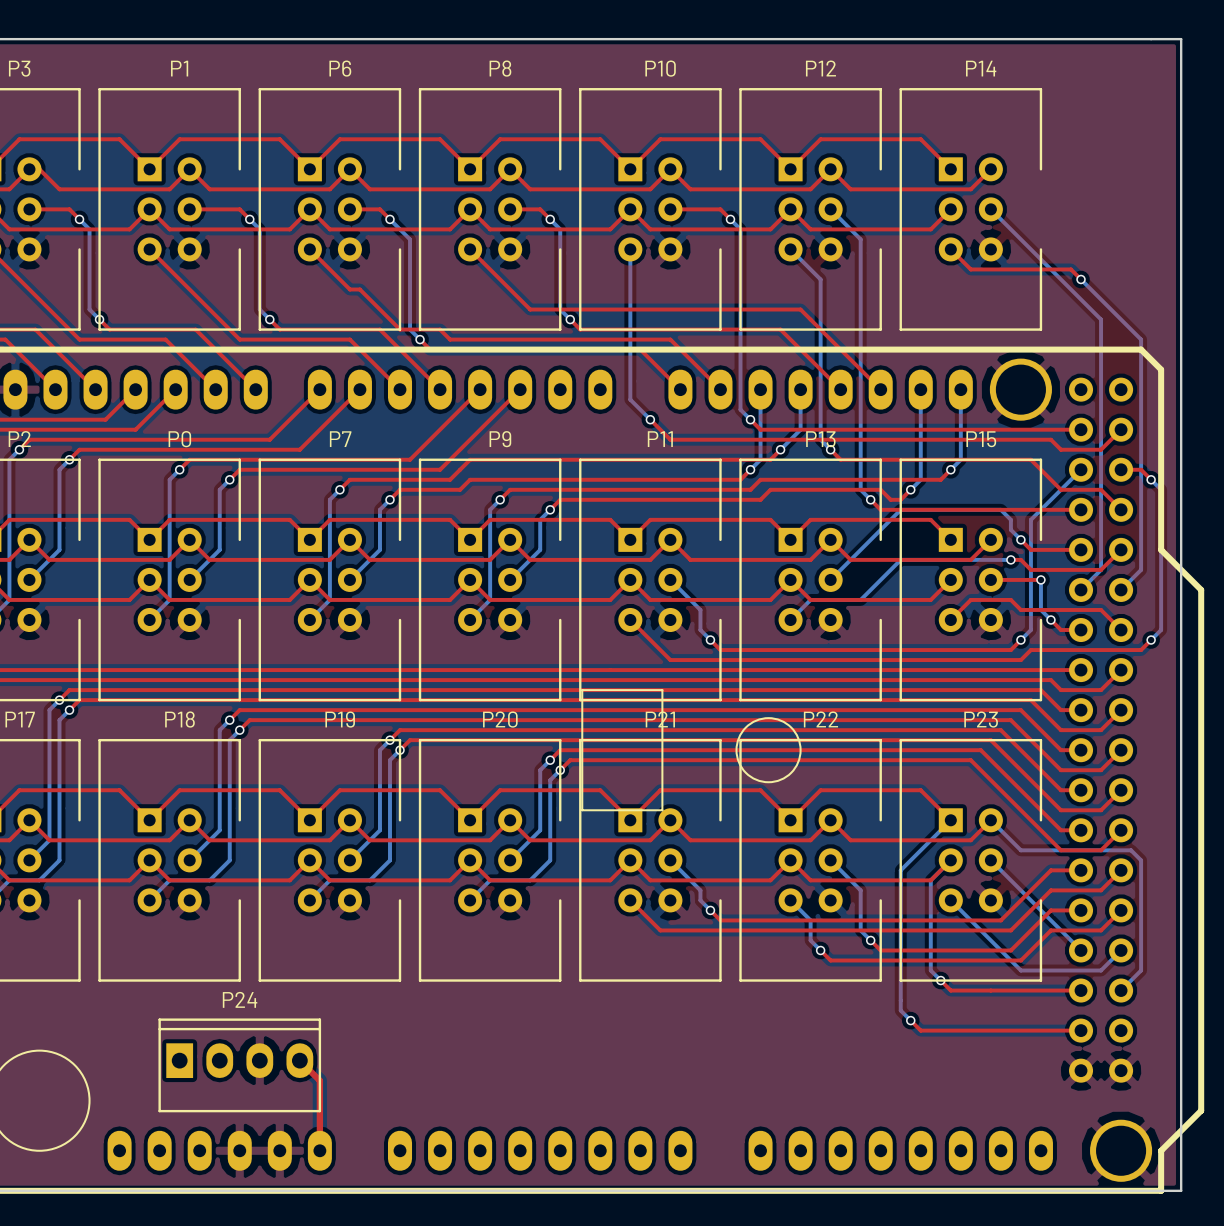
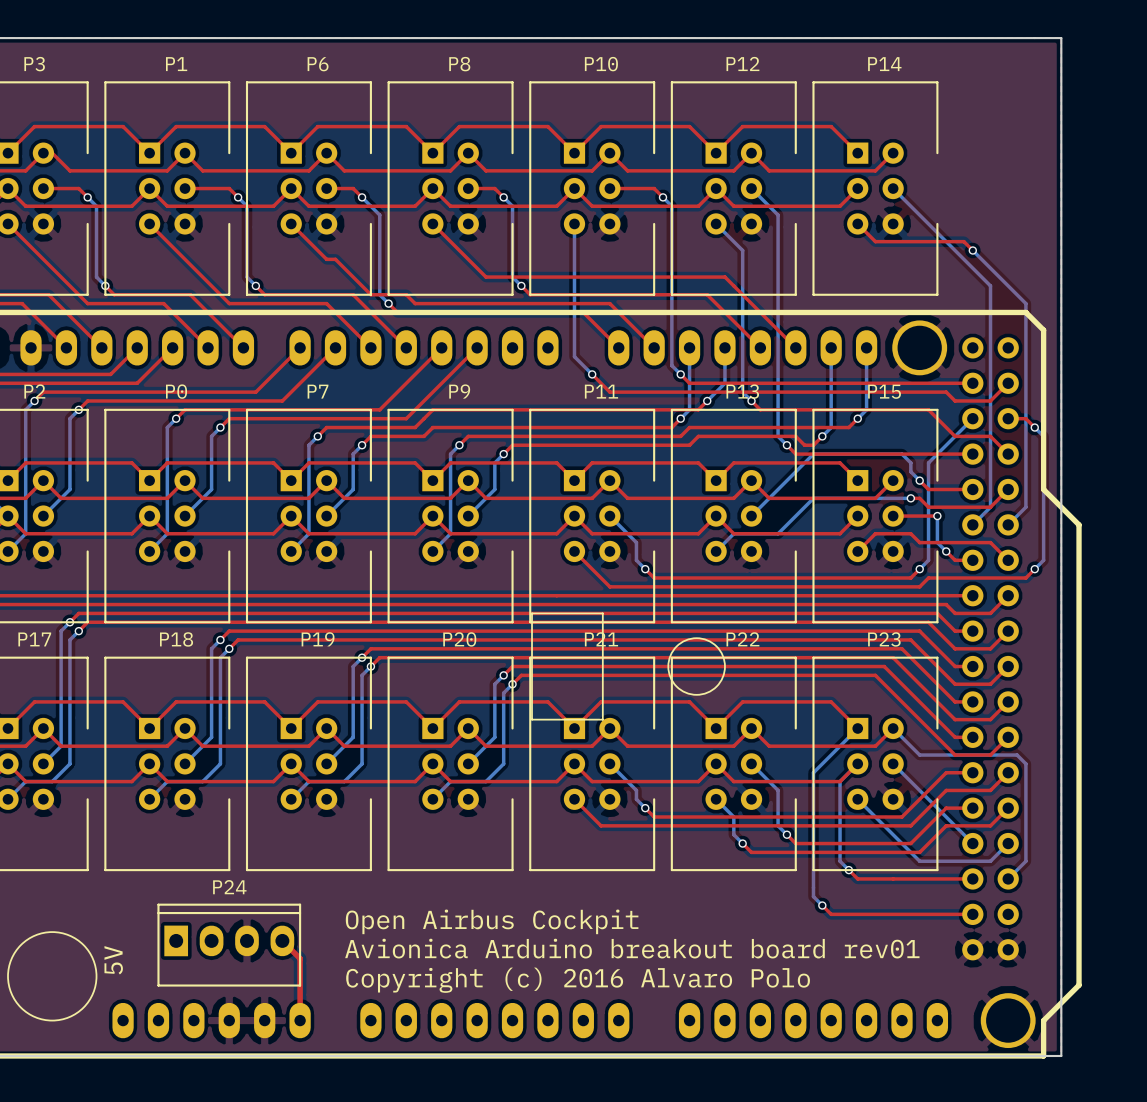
text: none -> Open Airbus Cockpit (492, 921)
text: none -> Avionica Arduino breakout board rev01 (632, 948)
text: none -> 5V (113, 960)
text: none -> Copyright (c) 2016 Alvaro Polo (578, 980)

